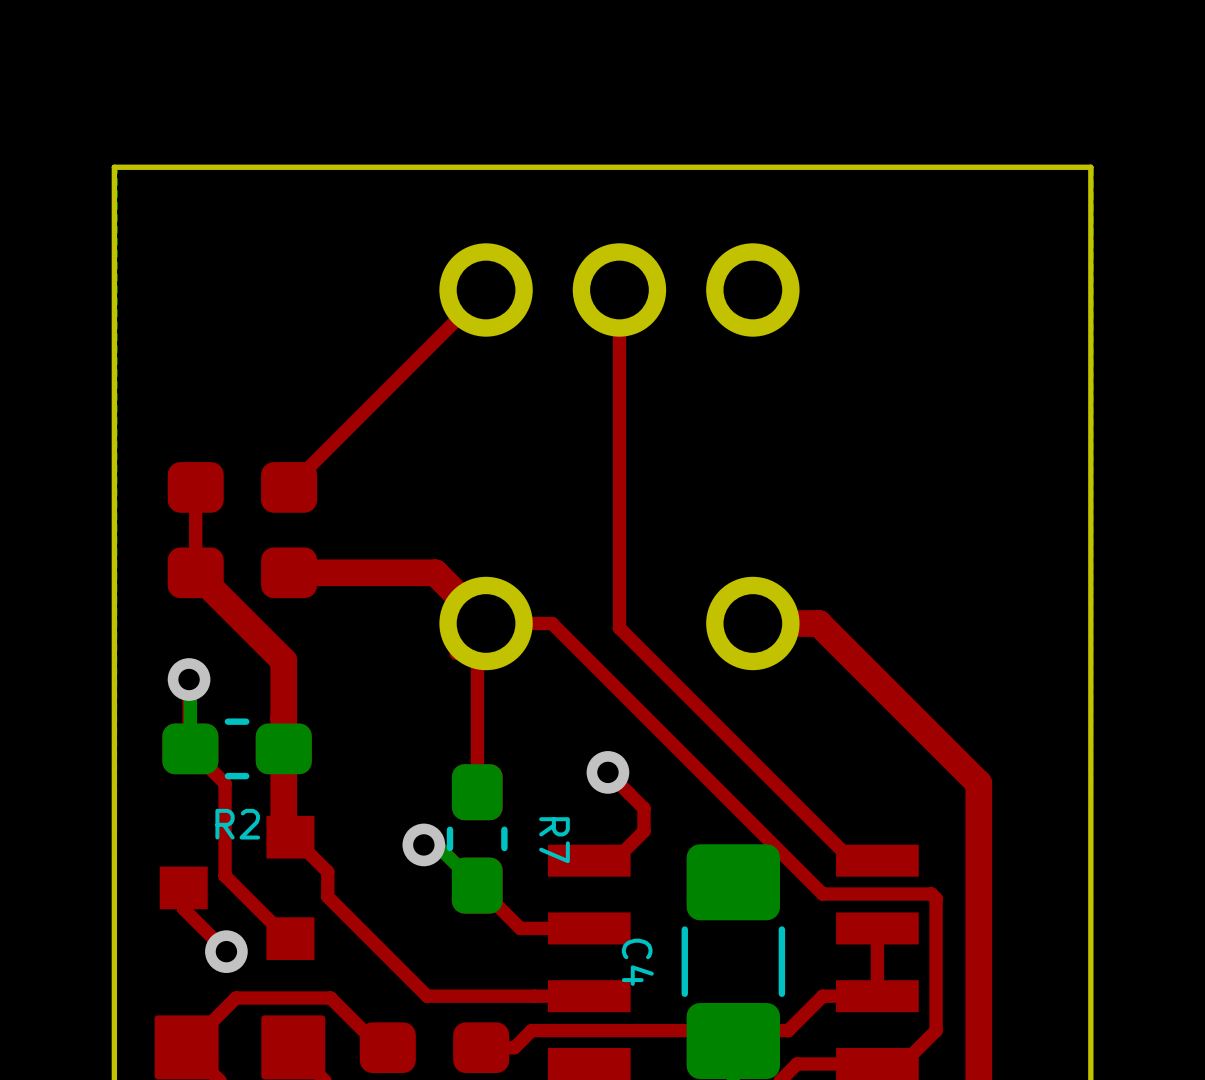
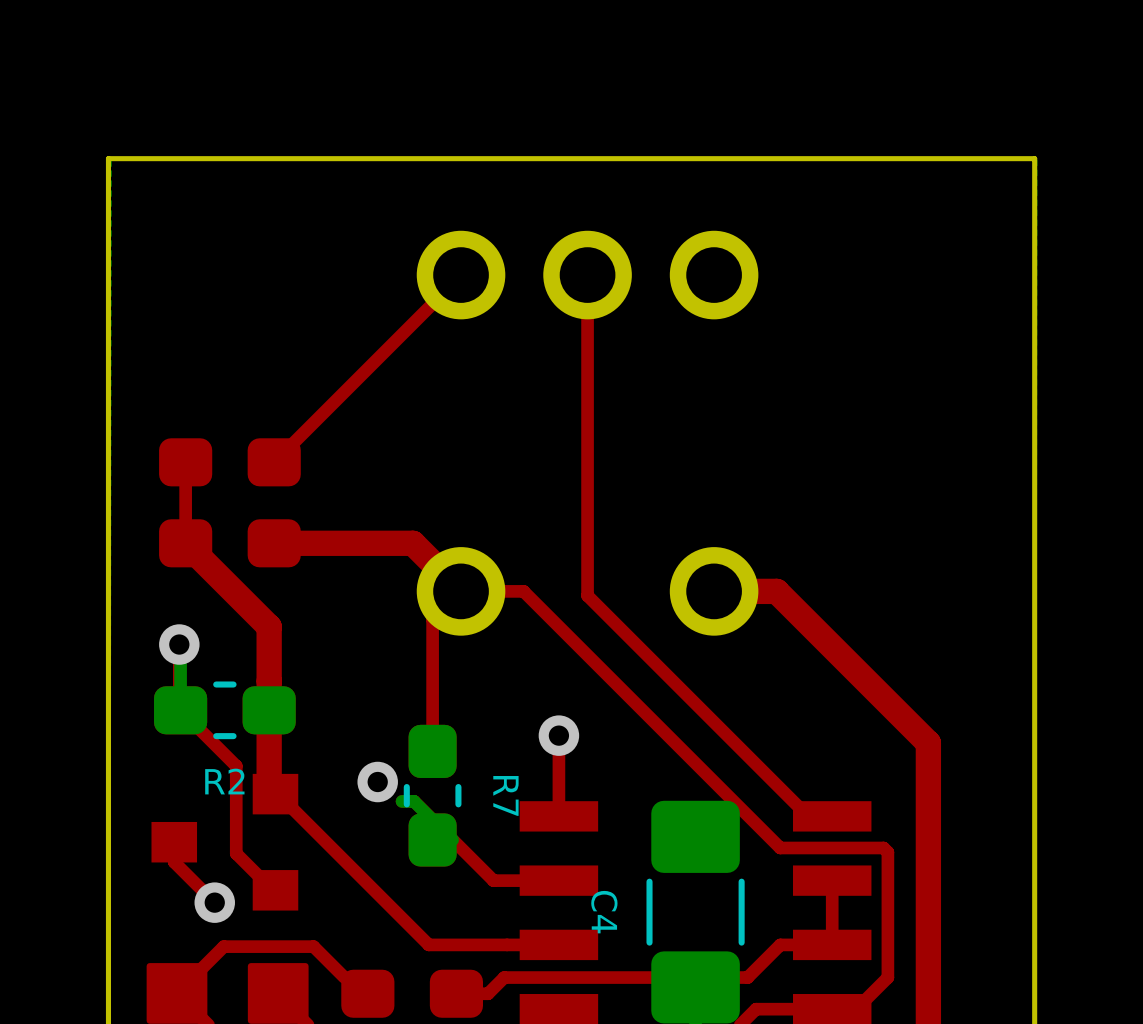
top track: (477, 653) (477, 792) -> (432, 619) (432, 751)
top track: (607, 772) (643, 808) (643, 831) (614, 860) (589, 860) -> (558, 735) (558, 816)
via position: (607, 772) -> (558, 735)
top track: (225, 783) (225, 875) (249, 899) -> (213, 743) (236, 765) (236, 853)
R7 position: (477, 838) -> (432, 795)
via position: (423, 844) -> (377, 782)
top track: (327, 871) (327, 896) (427, 996) (452, 996) -> (310, 827) (428, 944)

